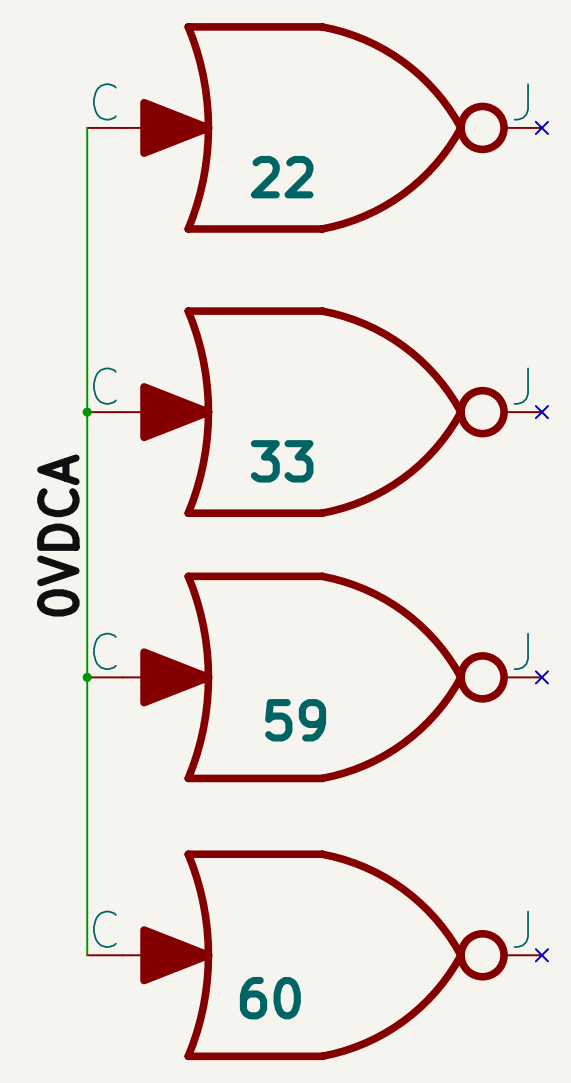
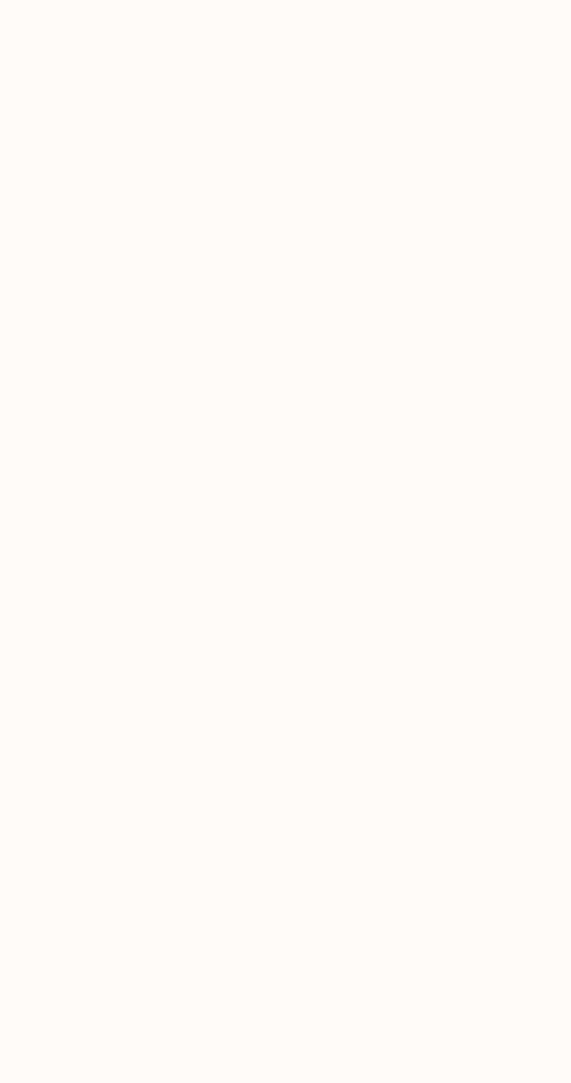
wire: (87, 127) (87, 955) -> none
part: (314, 127) -> none
no-connect mark: (541, 127) -> none
junction: (87, 412) -> none
part: (314, 412) -> none
no-connect mark: (541, 412) -> none
label: 0VDCA (58, 535) -> none
junction: (87, 677) -> none
part: (314, 677) -> none
no-connect mark: (541, 677) -> none
part: (314, 955) -> none
no-connect mark: (541, 955) -> none

